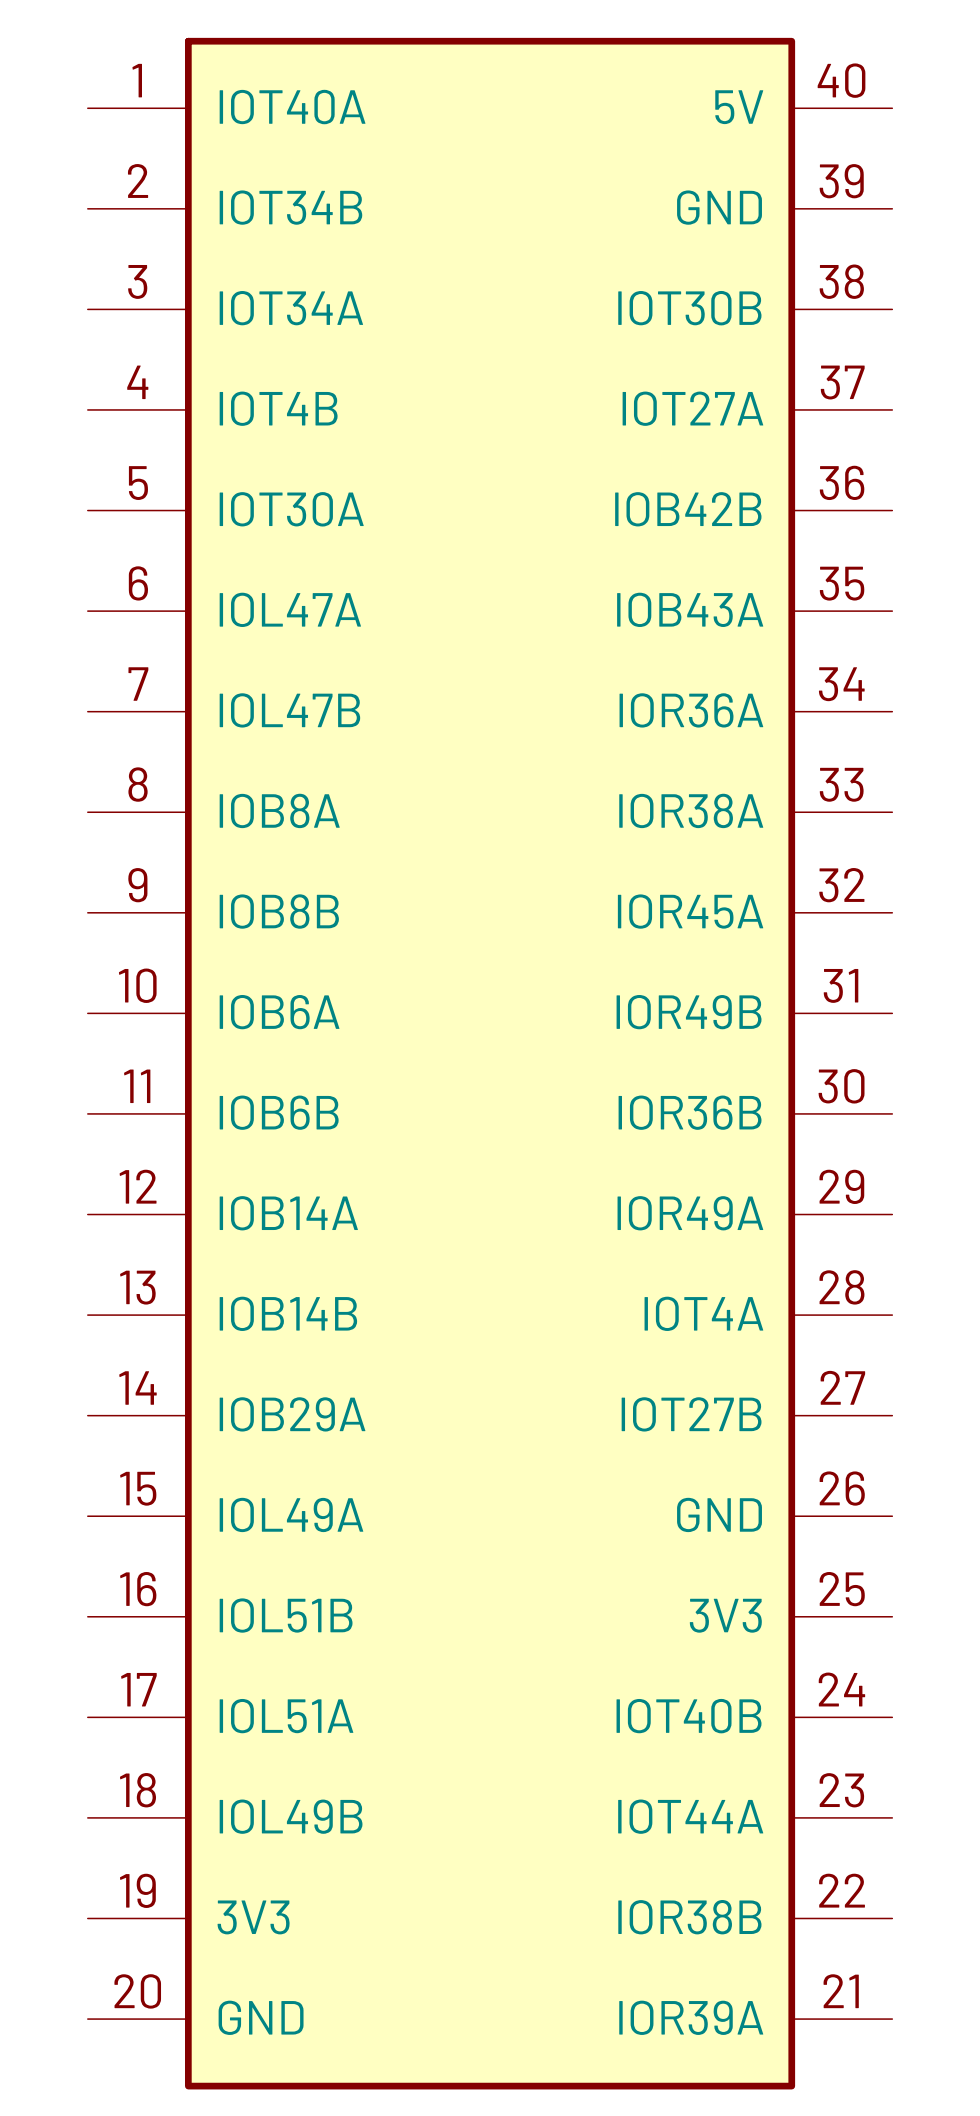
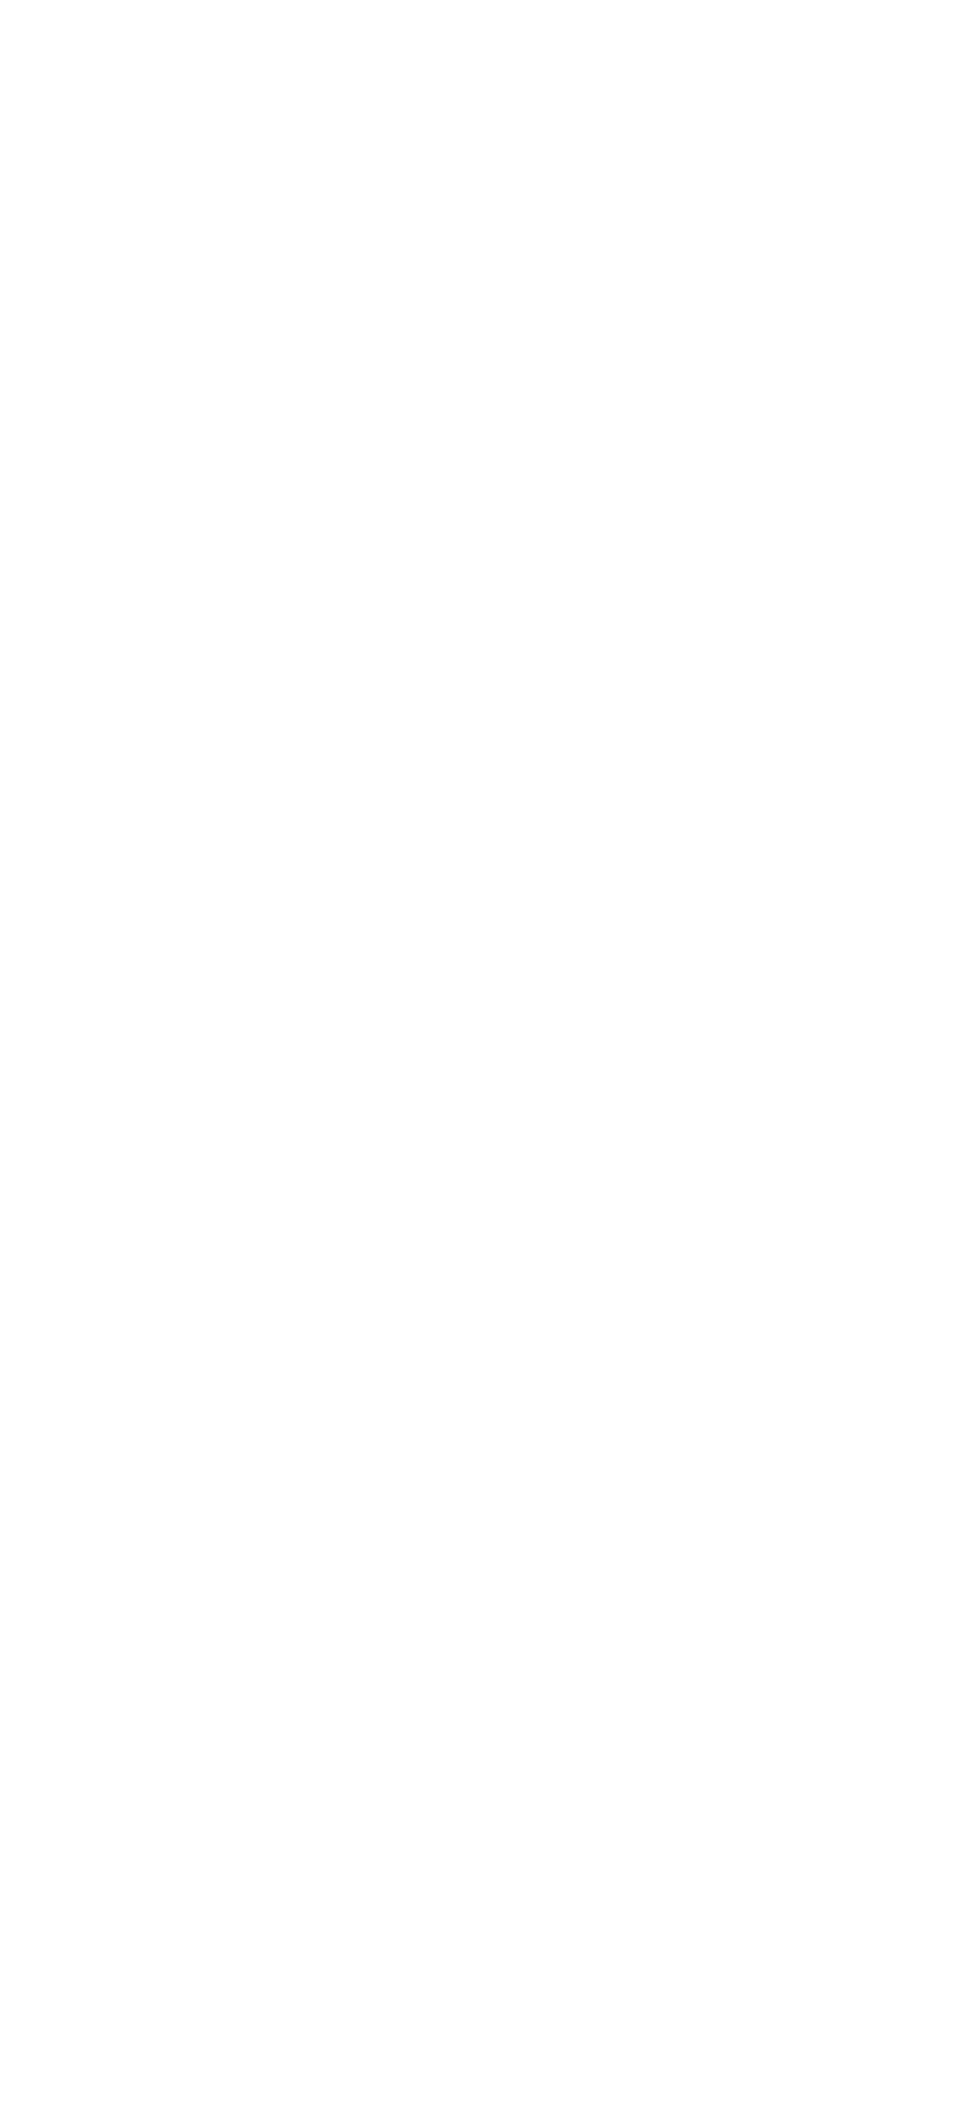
part: (490, 1063) -> none

